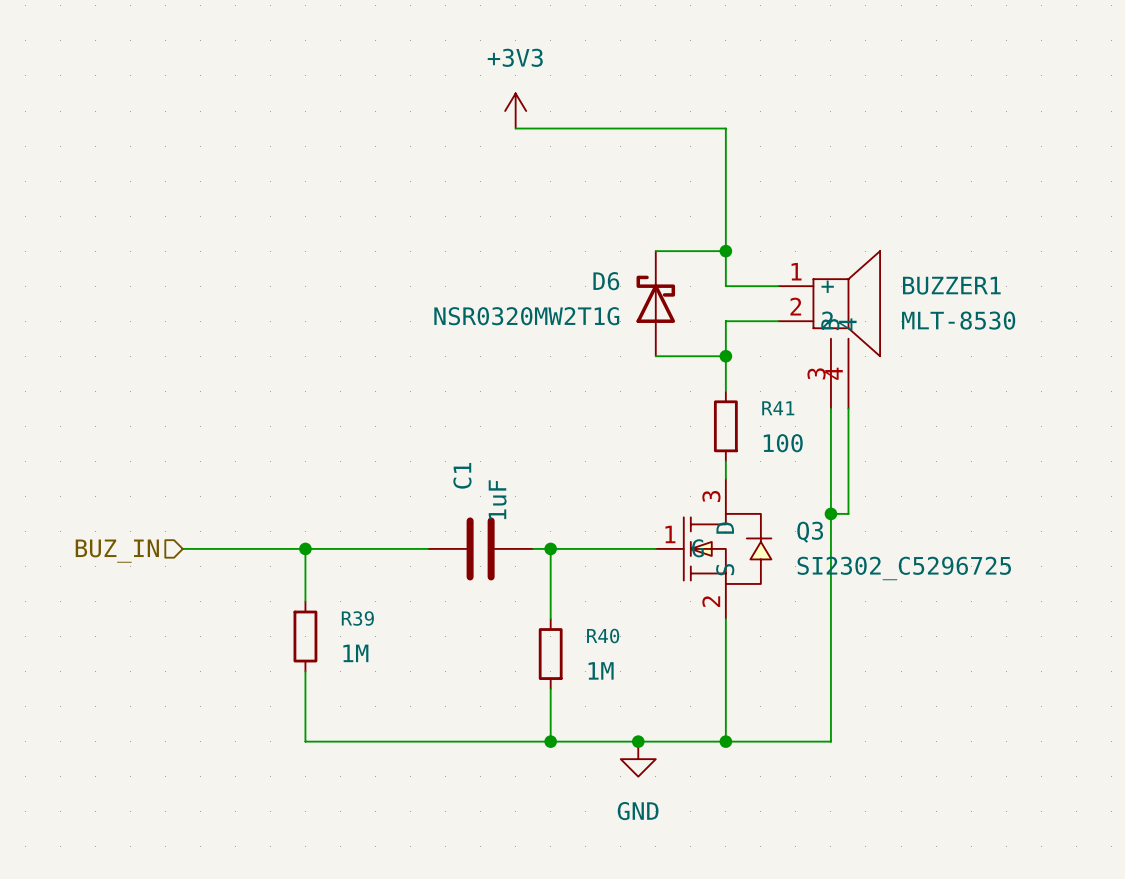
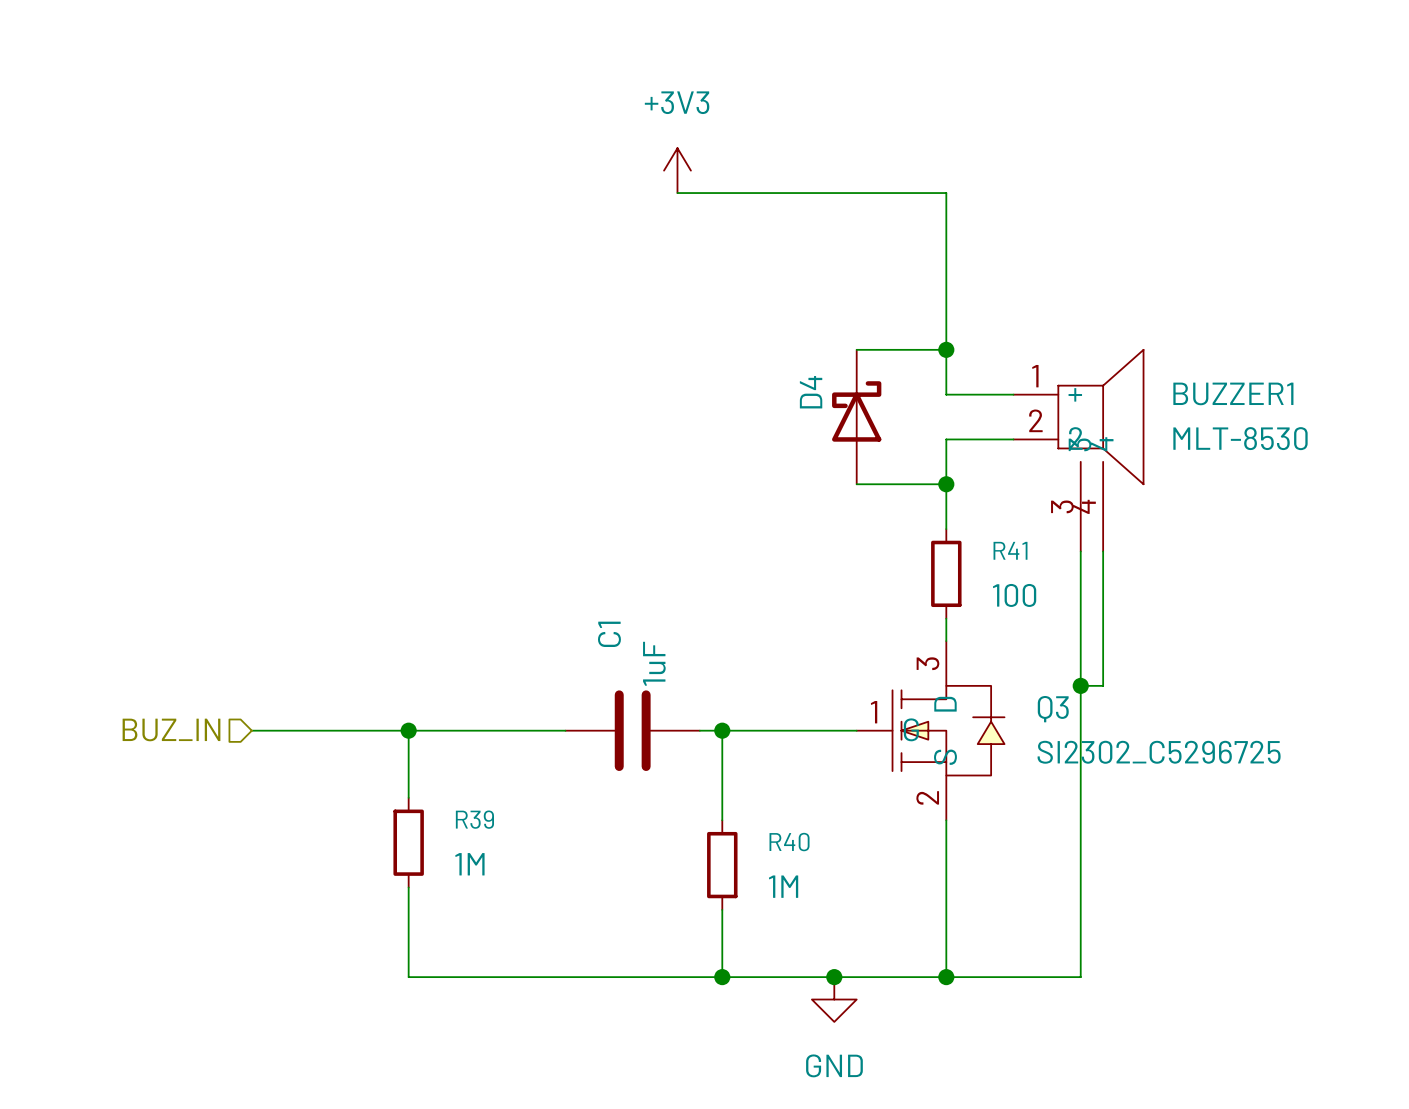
D6: NSR0320MW2T1G (655, 303) -> none
D4: none -> (856, 417)

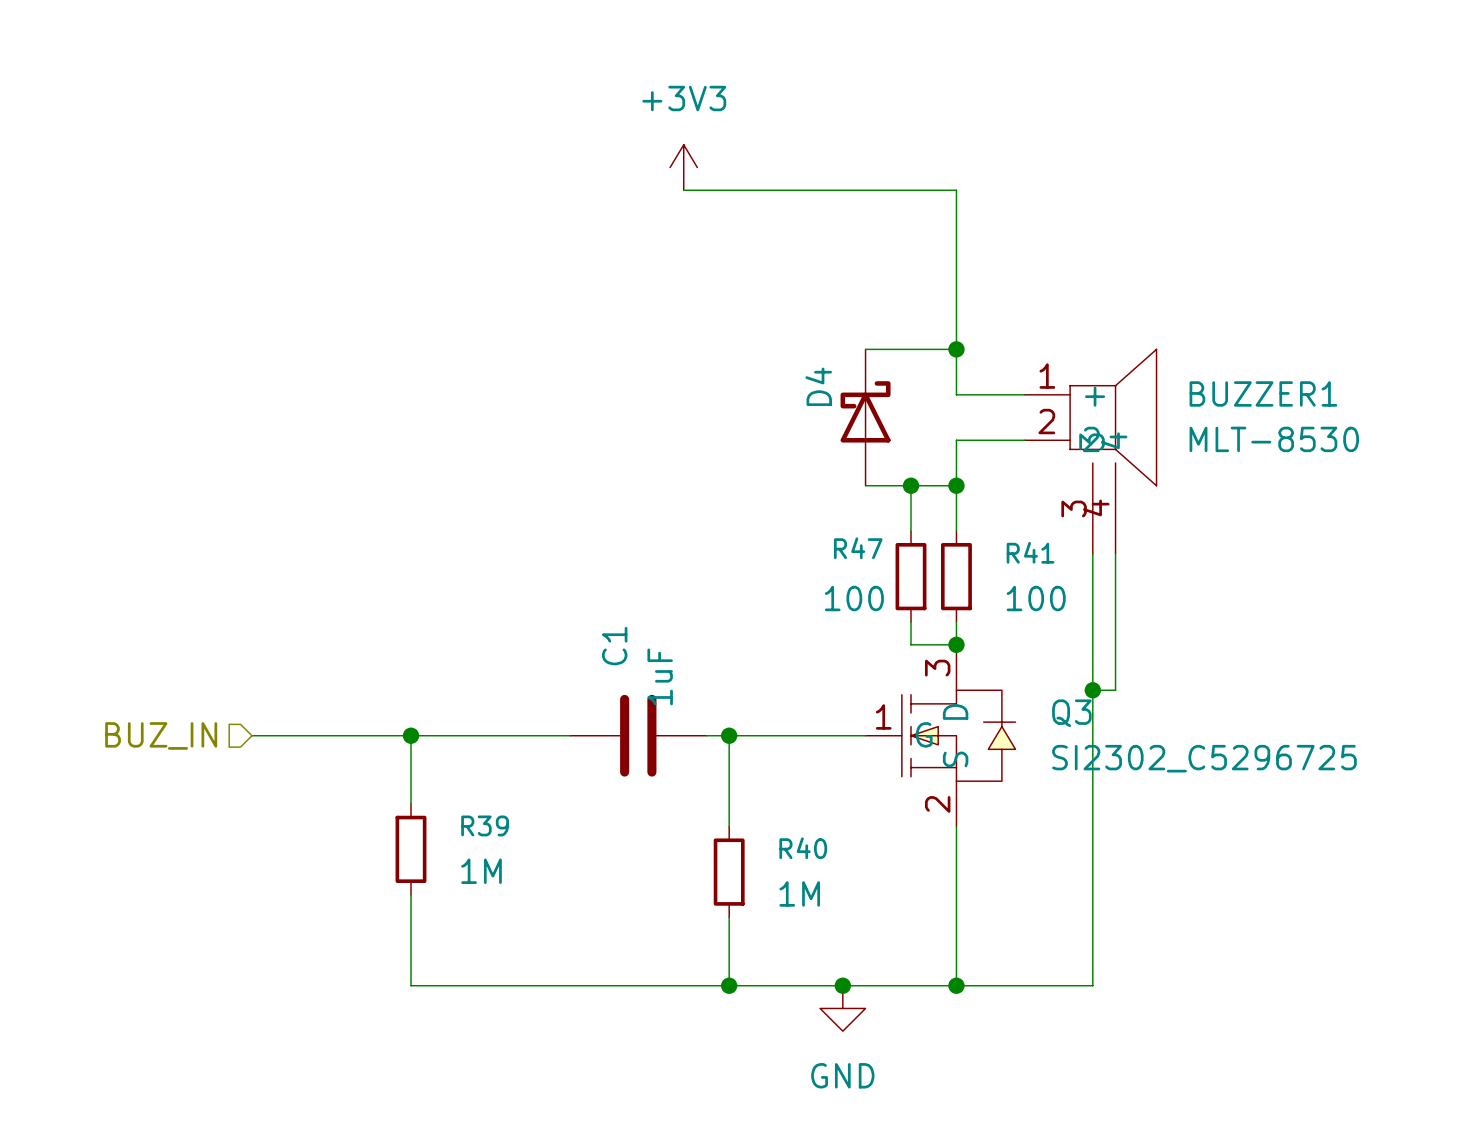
wire: none -> (911, 485) (911, 531)
junction: none -> (911, 485)
R47: none -> 100 (911, 576)
wire: none -> (911, 622) (911, 644) (956, 644)
junction: none -> (956, 644)

